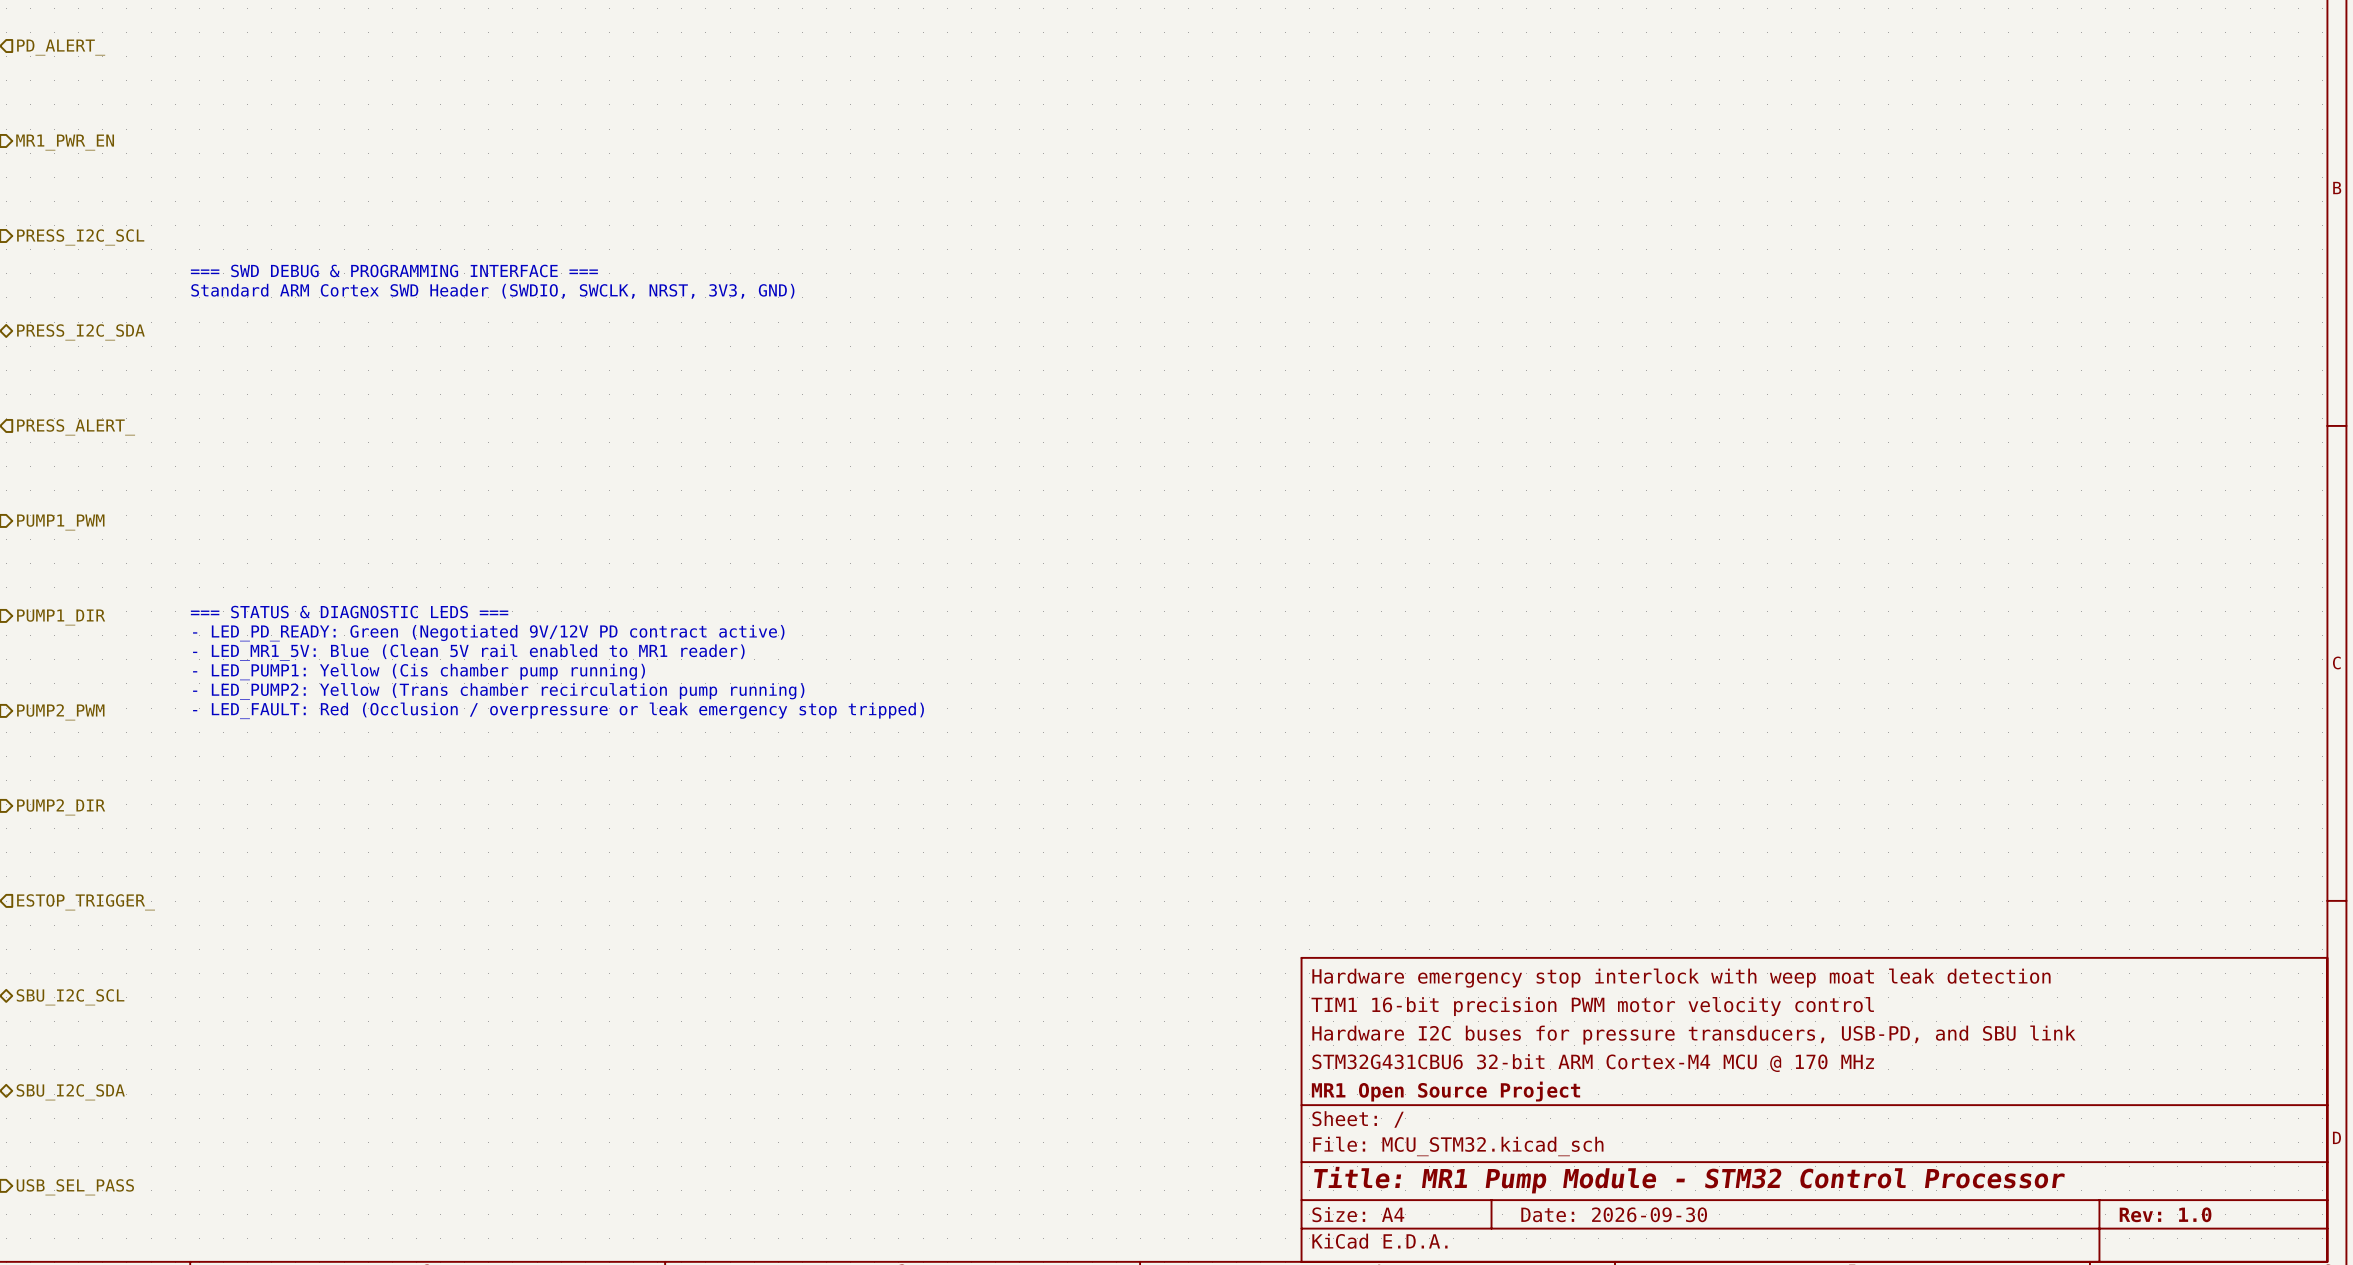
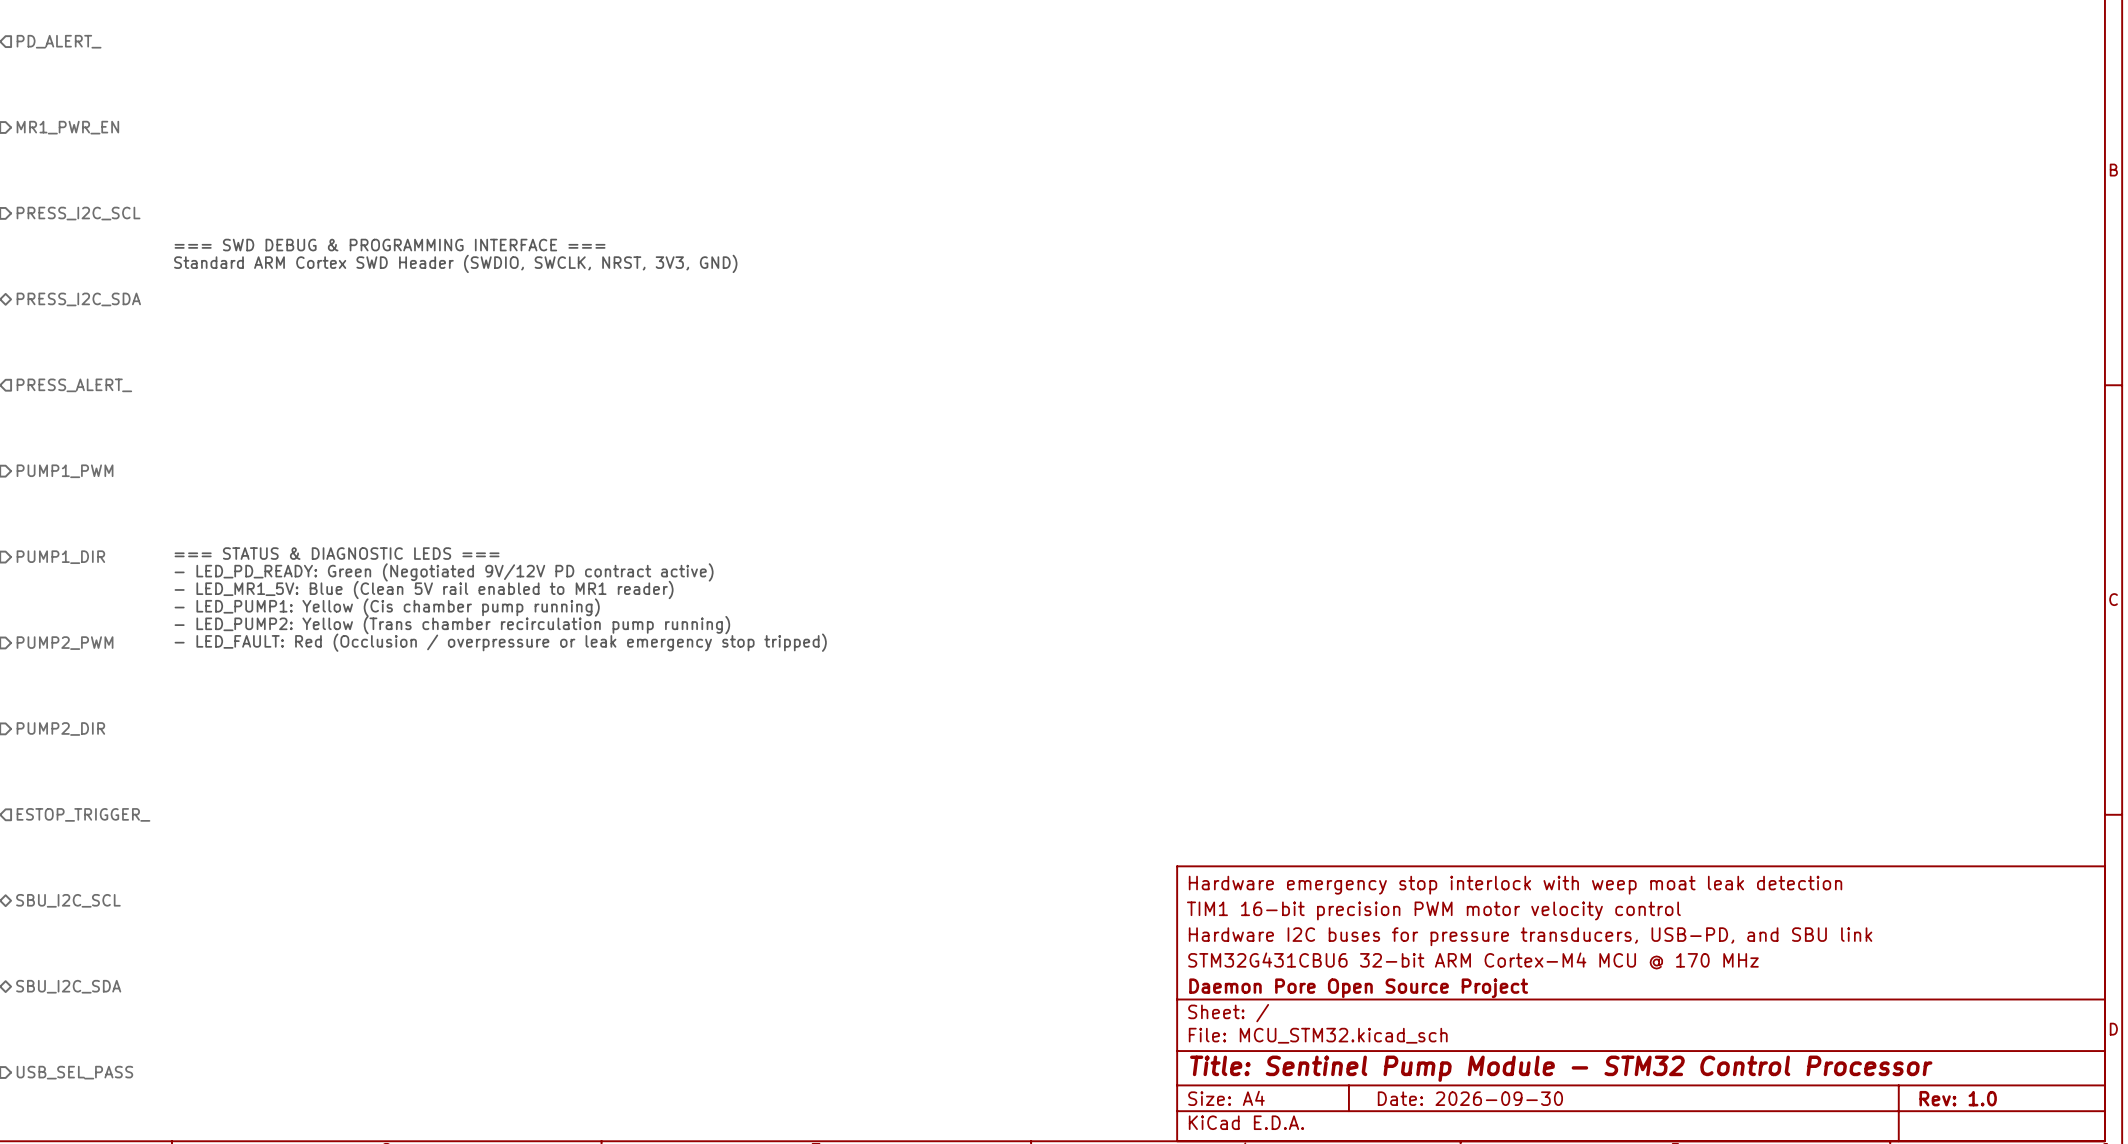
title block: MR1 Open Source Project (1446, 1091) -> Daemon Pore Open Source Project (1358, 988)
title block: Title: MR1 Pump Module - STM32 Control Processor (1689, 1180) -> Title: Sentinel Pump Module - STM32 Control Processor (1561, 1068)

